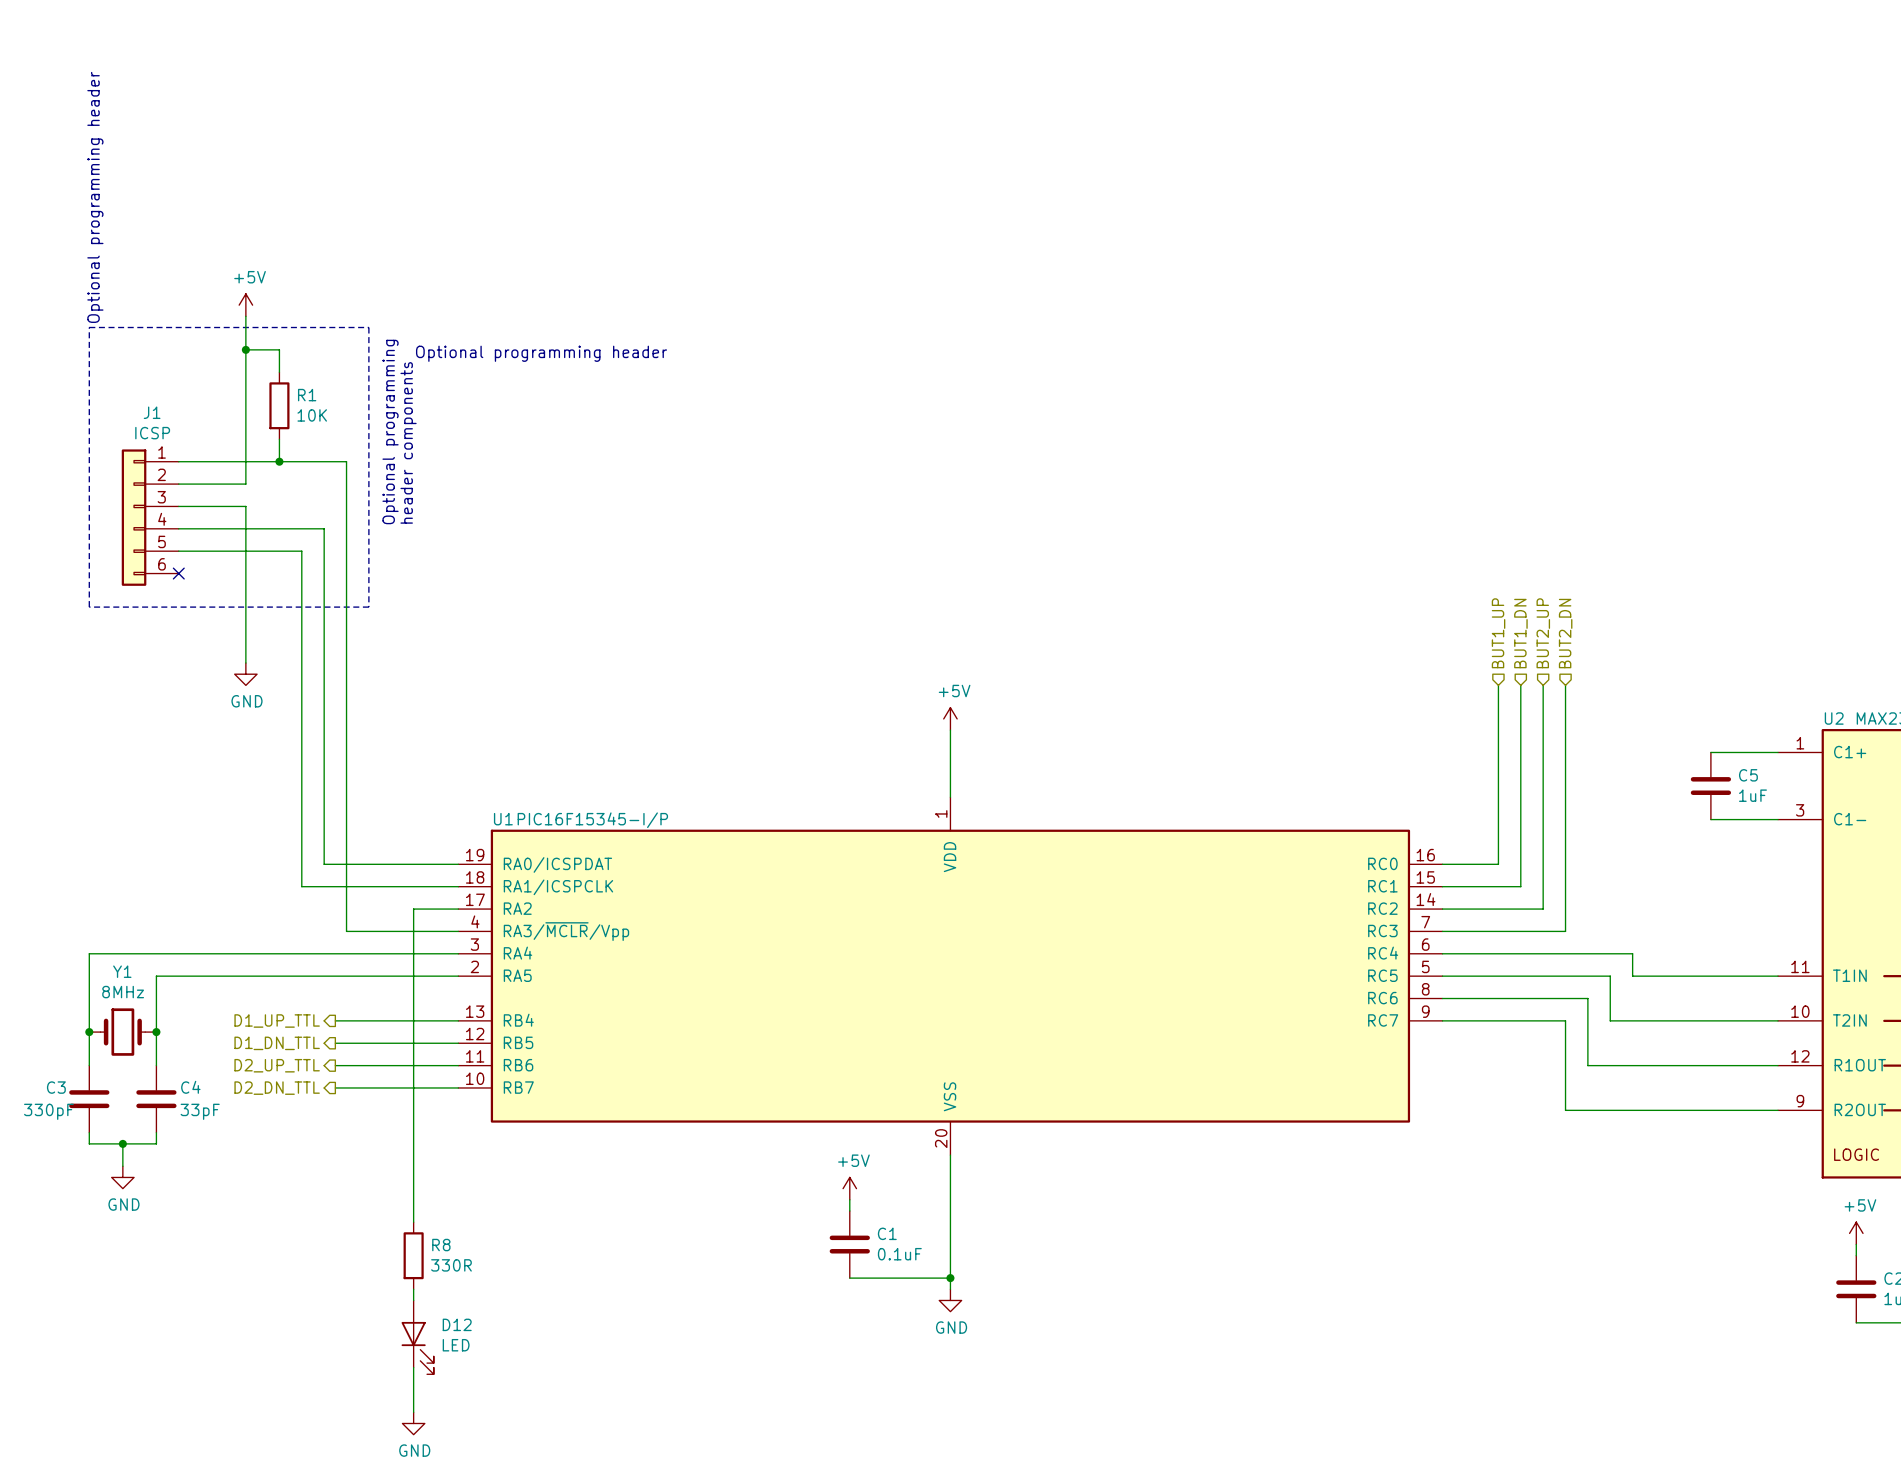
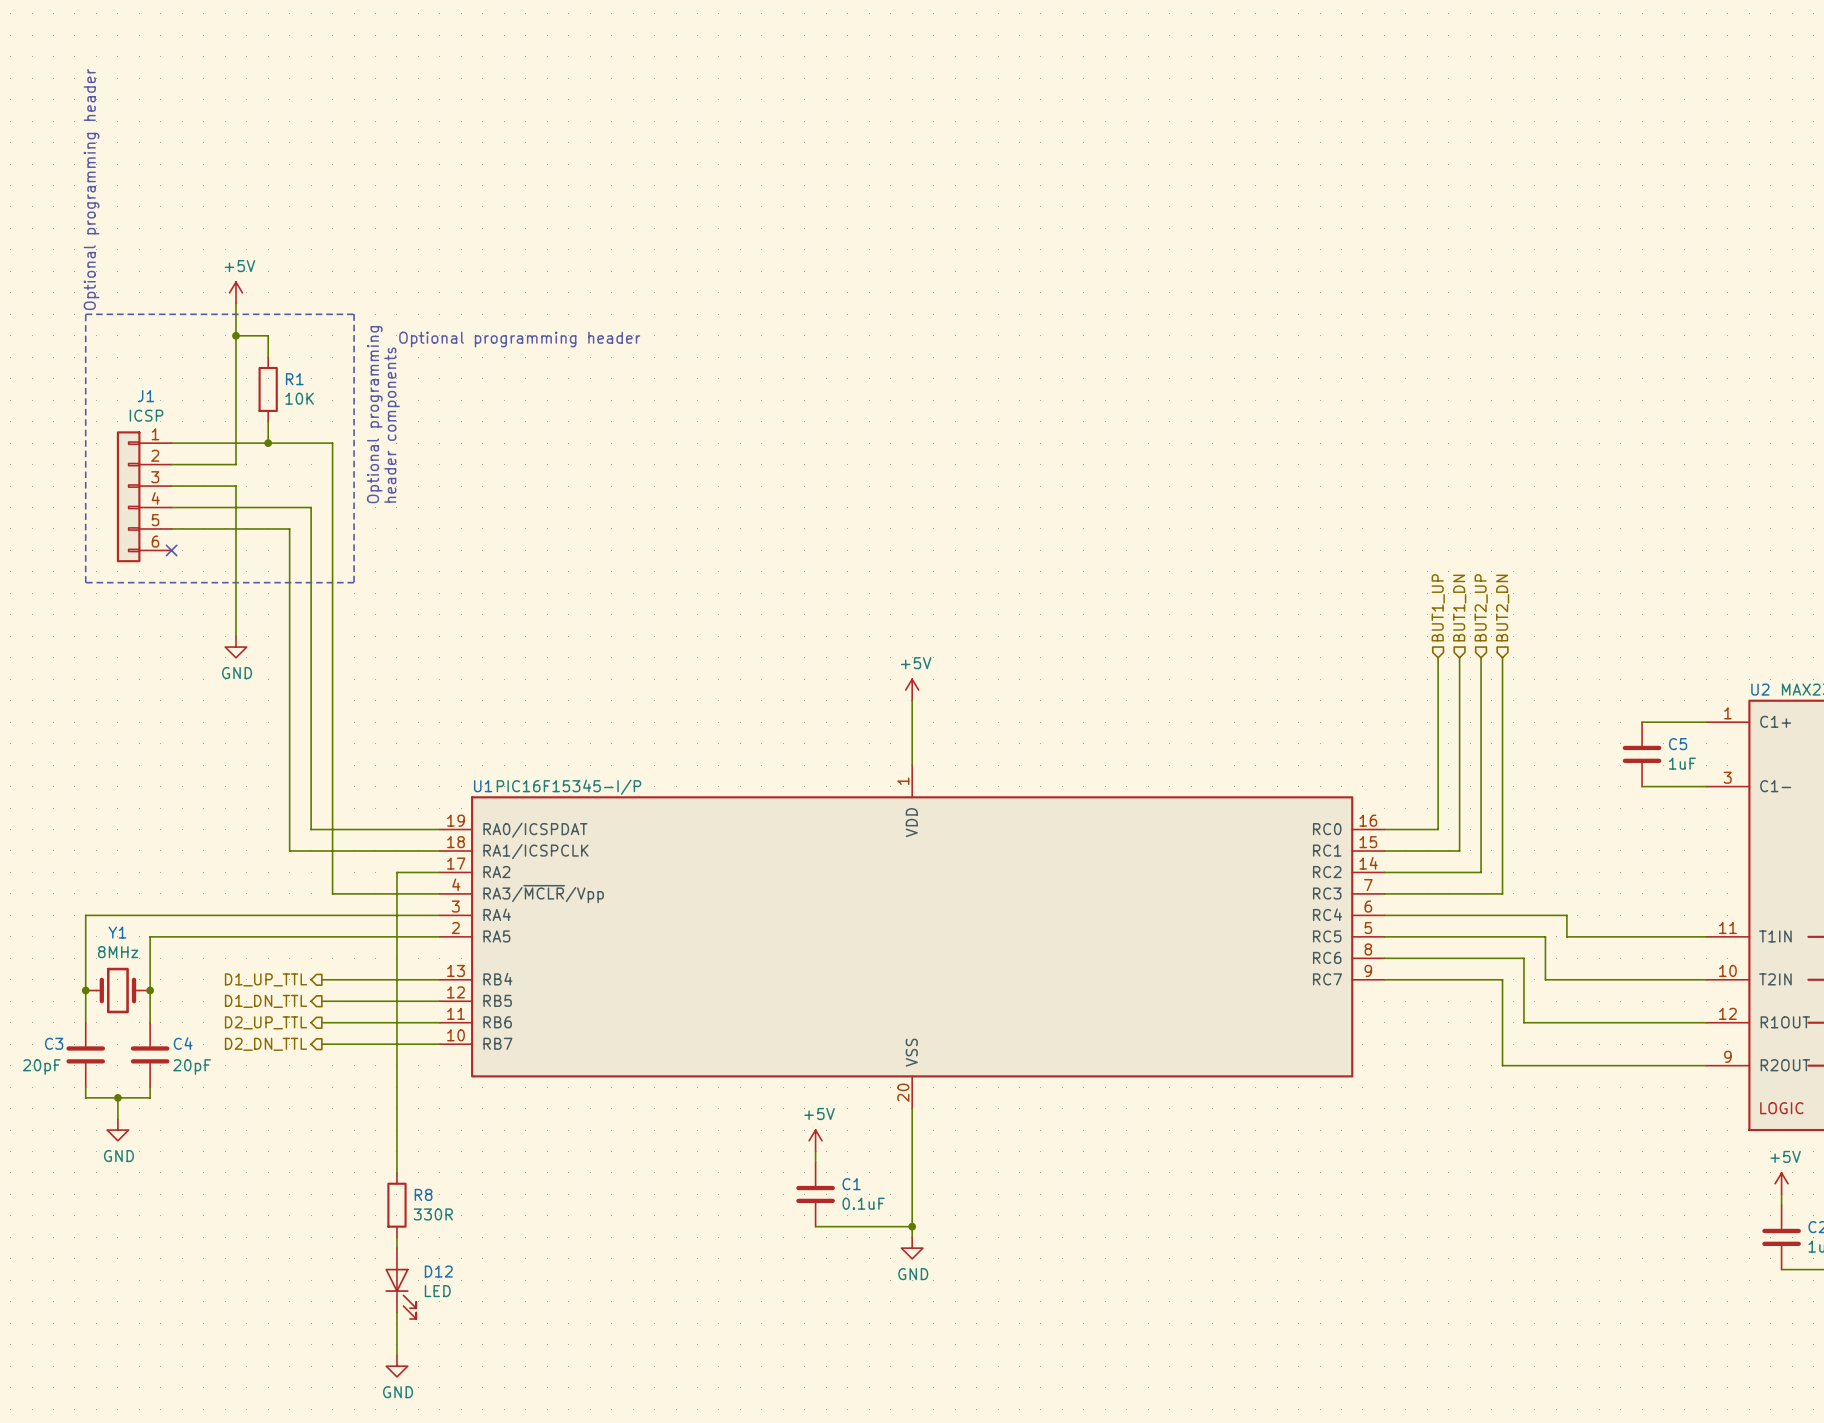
C3 value: 330pF (48, 1111) -> 20pF (41, 1067)
C4 value: 33pF (200, 1111) -> 20pF (192, 1067)

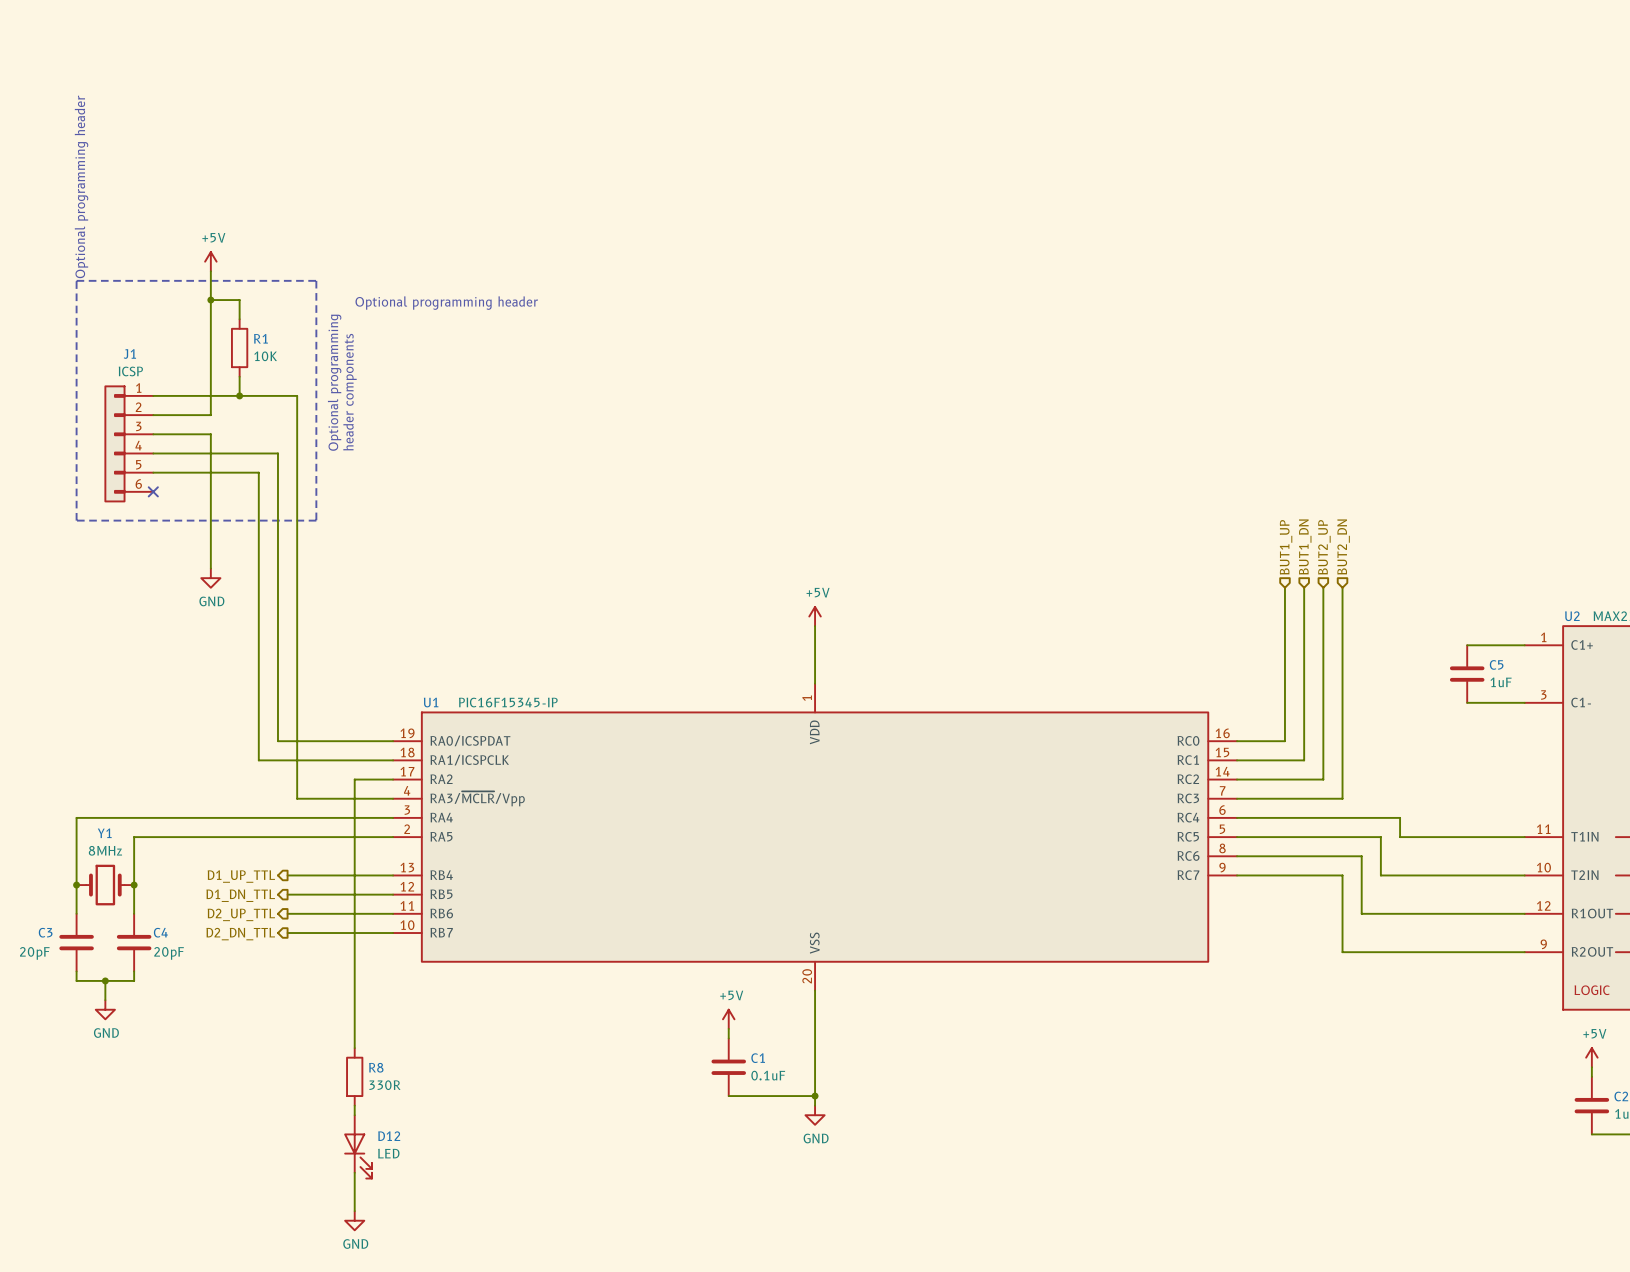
U1 value: PIC16F15345-I/P (568, 787) -> PIC16F15345-IP (508, 702)

